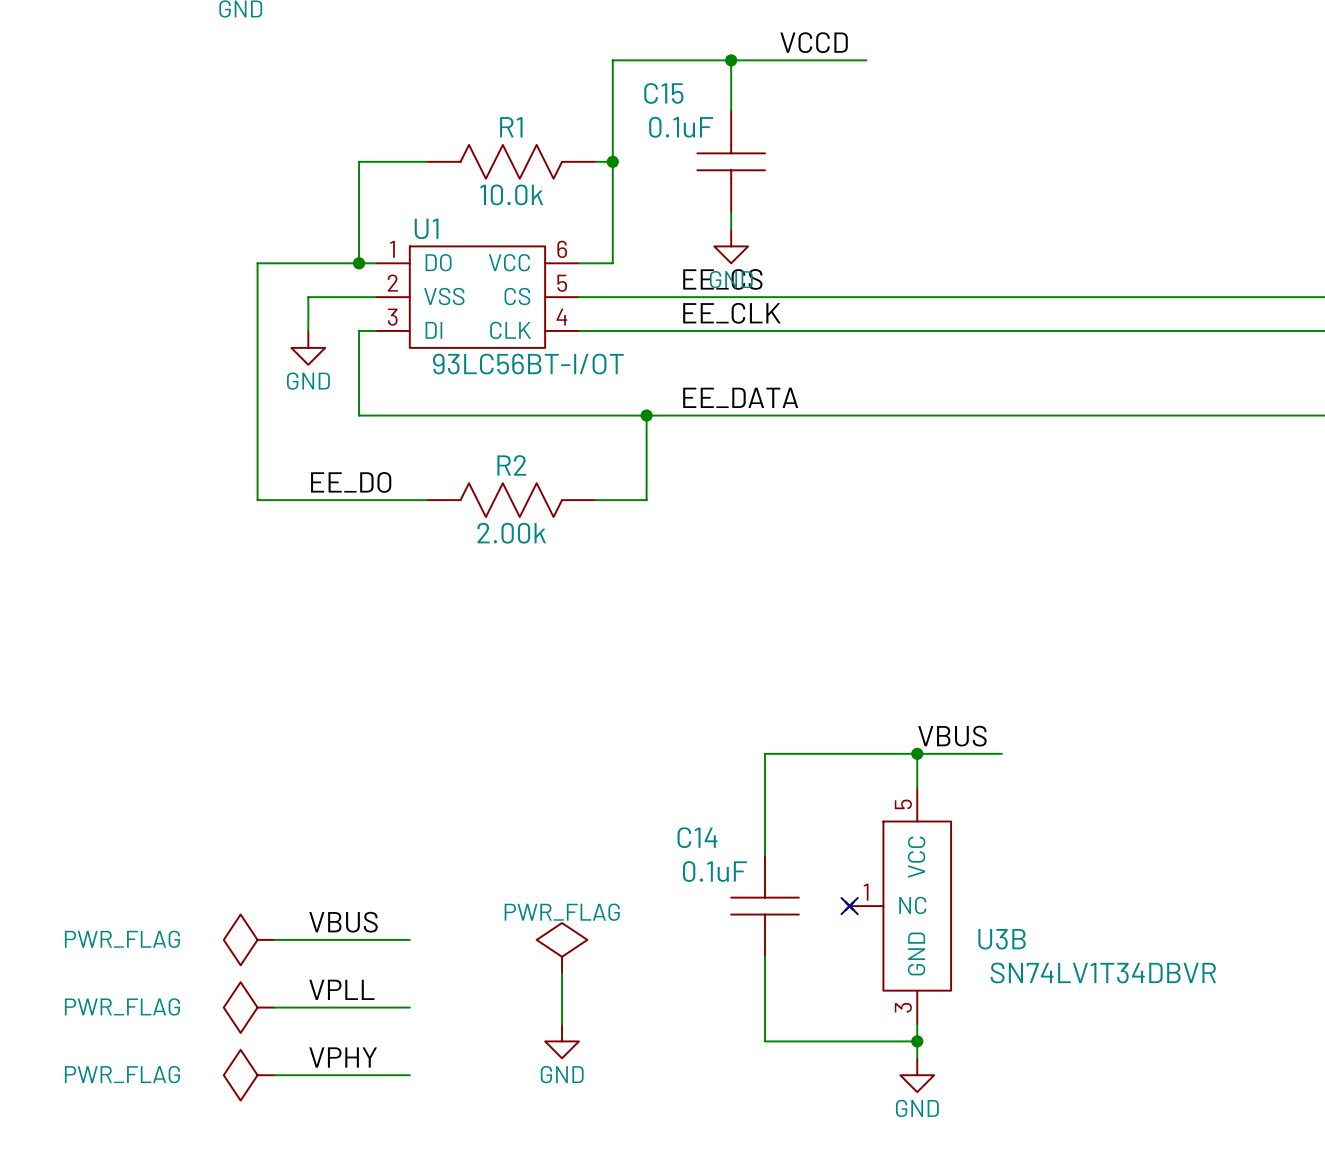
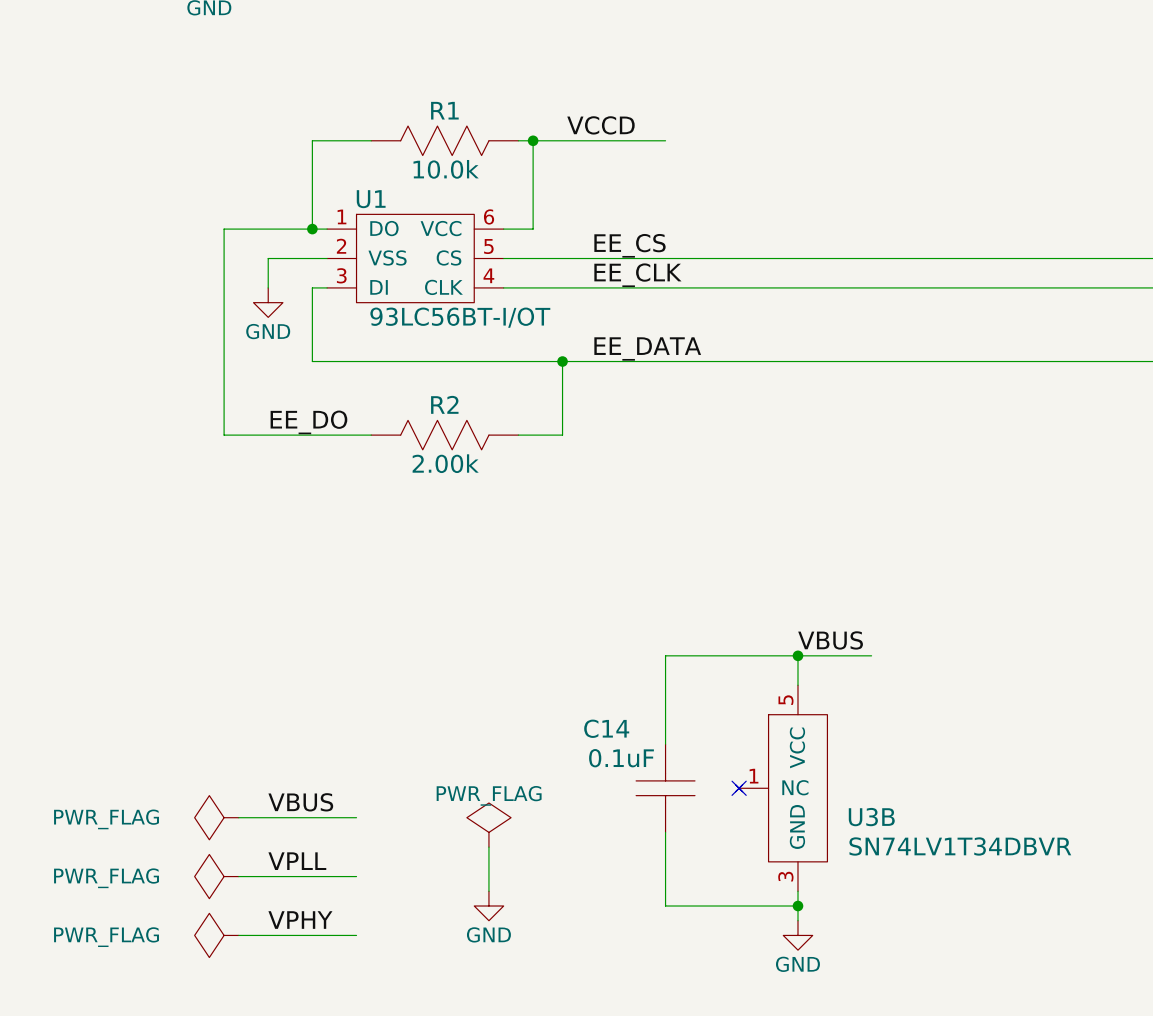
label position: VCCD (814, 42) -> VCCD (600, 125)
wire: (731, 60) (731, 111) -> none
junction: (731, 60) -> none
wire: (866, 60) (612, 60) (612, 161) -> (665, 140) (533, 140)
C15: (731, 161) -> none
wire: (731, 212) (731, 229) -> none
power symbol: GND (731, 246) -> none

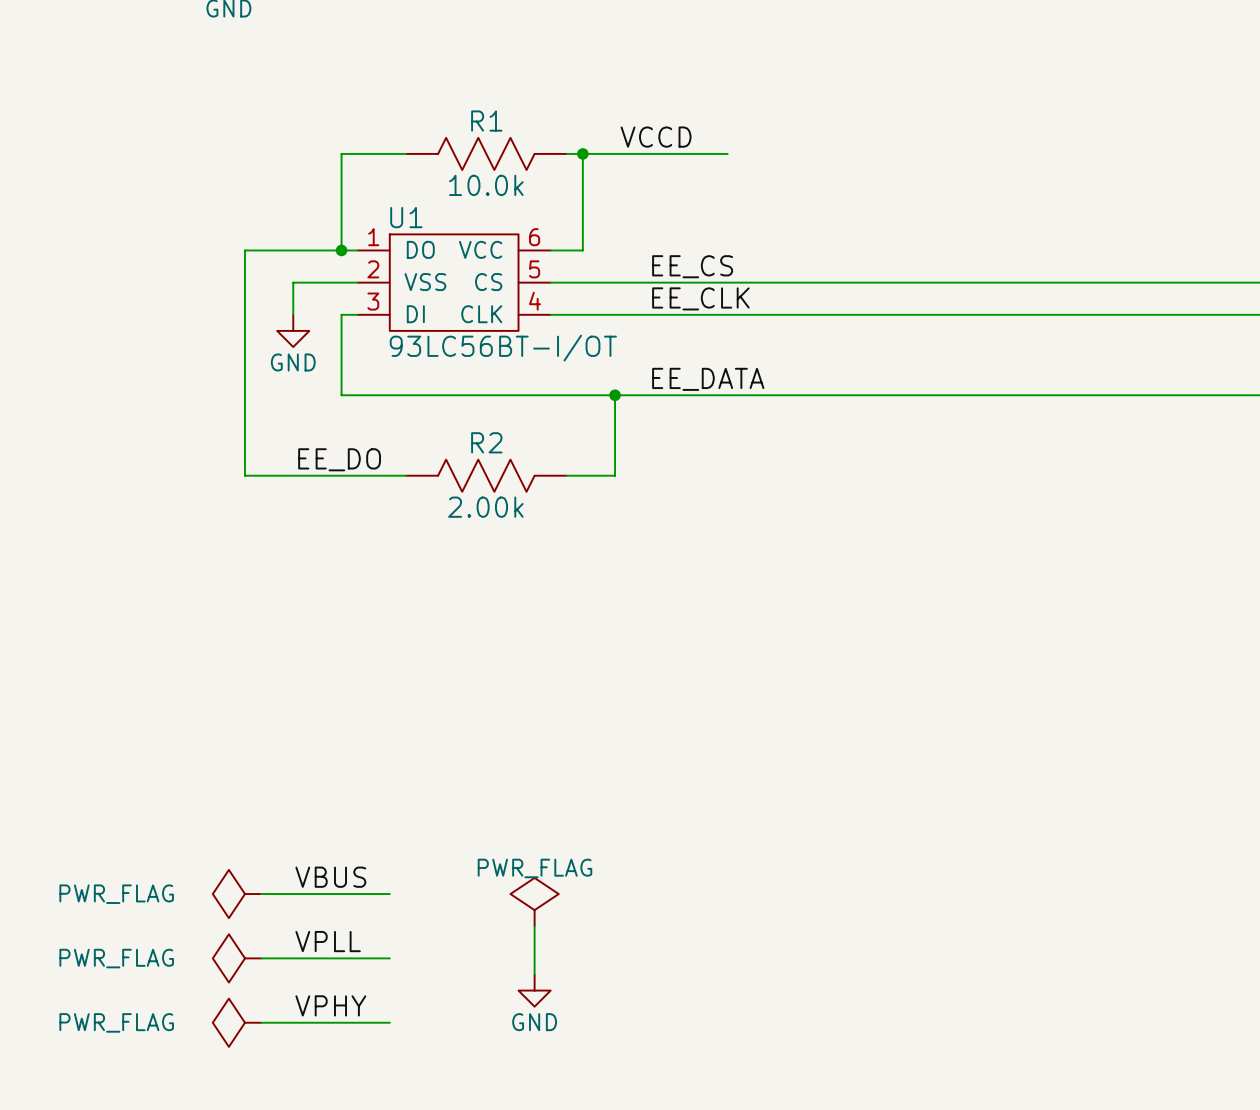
label: VBUS (830, 640) -> none
wire: (797, 655) (797, 685) -> none
junction: (797, 655) -> none
wire: (871, 655) (665, 655) (665, 744) -> none
C14: (665, 788) -> none
no-connect mark: (739, 788) -> none
U3B: SN74LV1T34DBVR (781, 788) -> none
wire: (665, 832) (665, 906) (797, 906) -> none
wire: (797, 891) (797, 920) -> none
junction: (797, 906) -> none
power symbol: GND (797, 935) -> none

